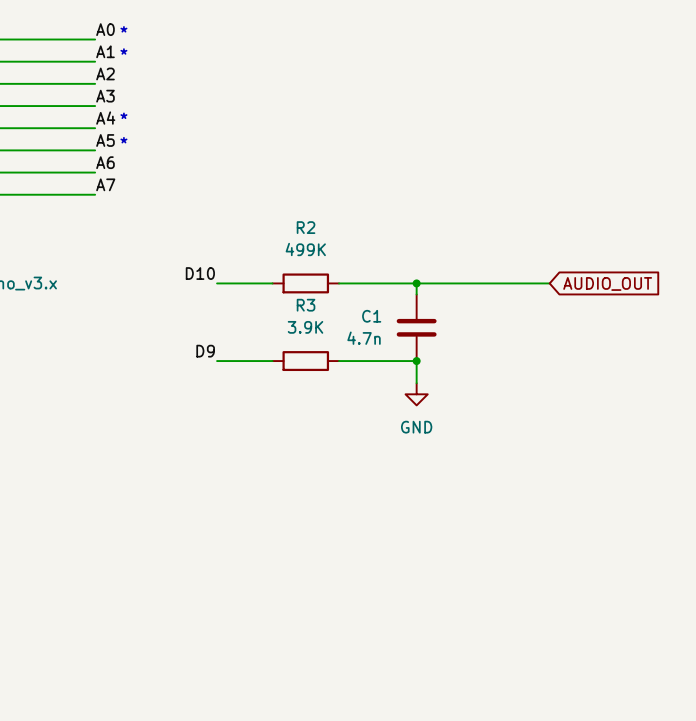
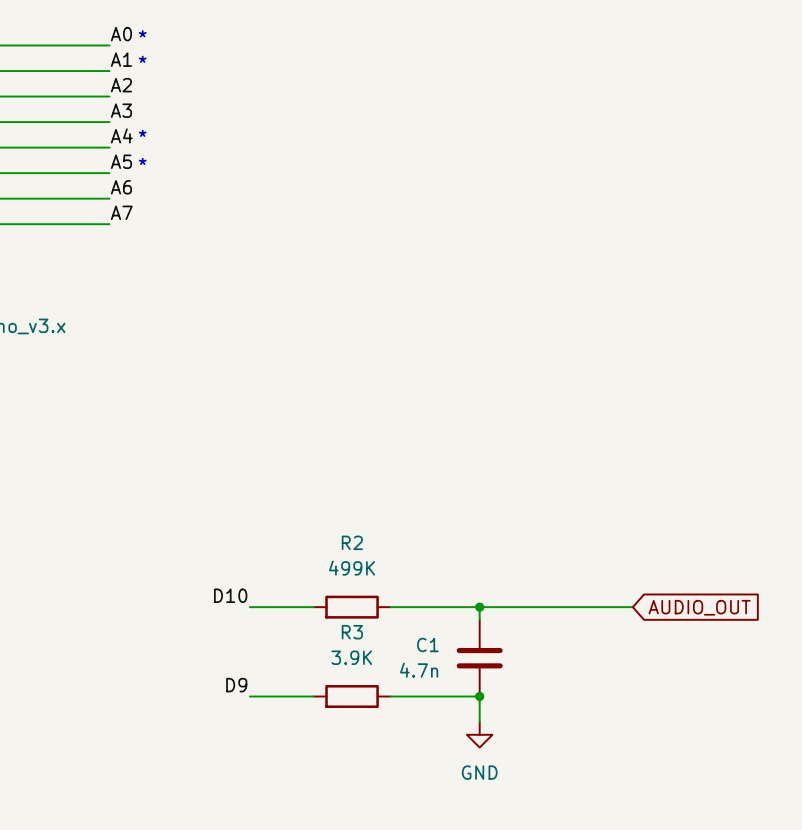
label: D10 (200, 273) -> none
wire: (217, 283) (272, 283) -> none
R2 position: (305, 283) -> (352, 607)
wire: (339, 283) (549, 283) -> none
wire: (416, 283) (416, 294) -> none
junction: (416, 283) -> none
global label: AUDIO_OUT (607, 283) -> none
C1 position: (416, 327) -> (479, 658)
label: D9 (205, 351) -> none
wire: (217, 361) (272, 361) -> (249, 607) (313, 607)
R3 position: (305, 361) -> (352, 696)
wire: (339, 361) (416, 361) (416, 383) -> none
junction: (416, 361) -> none
power symbol: GND (416, 394) -> none
label: none -> D10 (230, 595)
wire: none -> (390, 607) (632, 607)
wire: none -> (479, 607) (479, 619)
junction: none -> (479, 607)
global label: none -> AUDIO_OUT (699, 607)
label: none -> D9 (236, 685)
wire: none -> (249, 696) (313, 696)
wire: none -> (390, 696) (479, 696) (479, 722)
junction: none -> (479, 696)
power symbol: none -> GND (479, 734)

